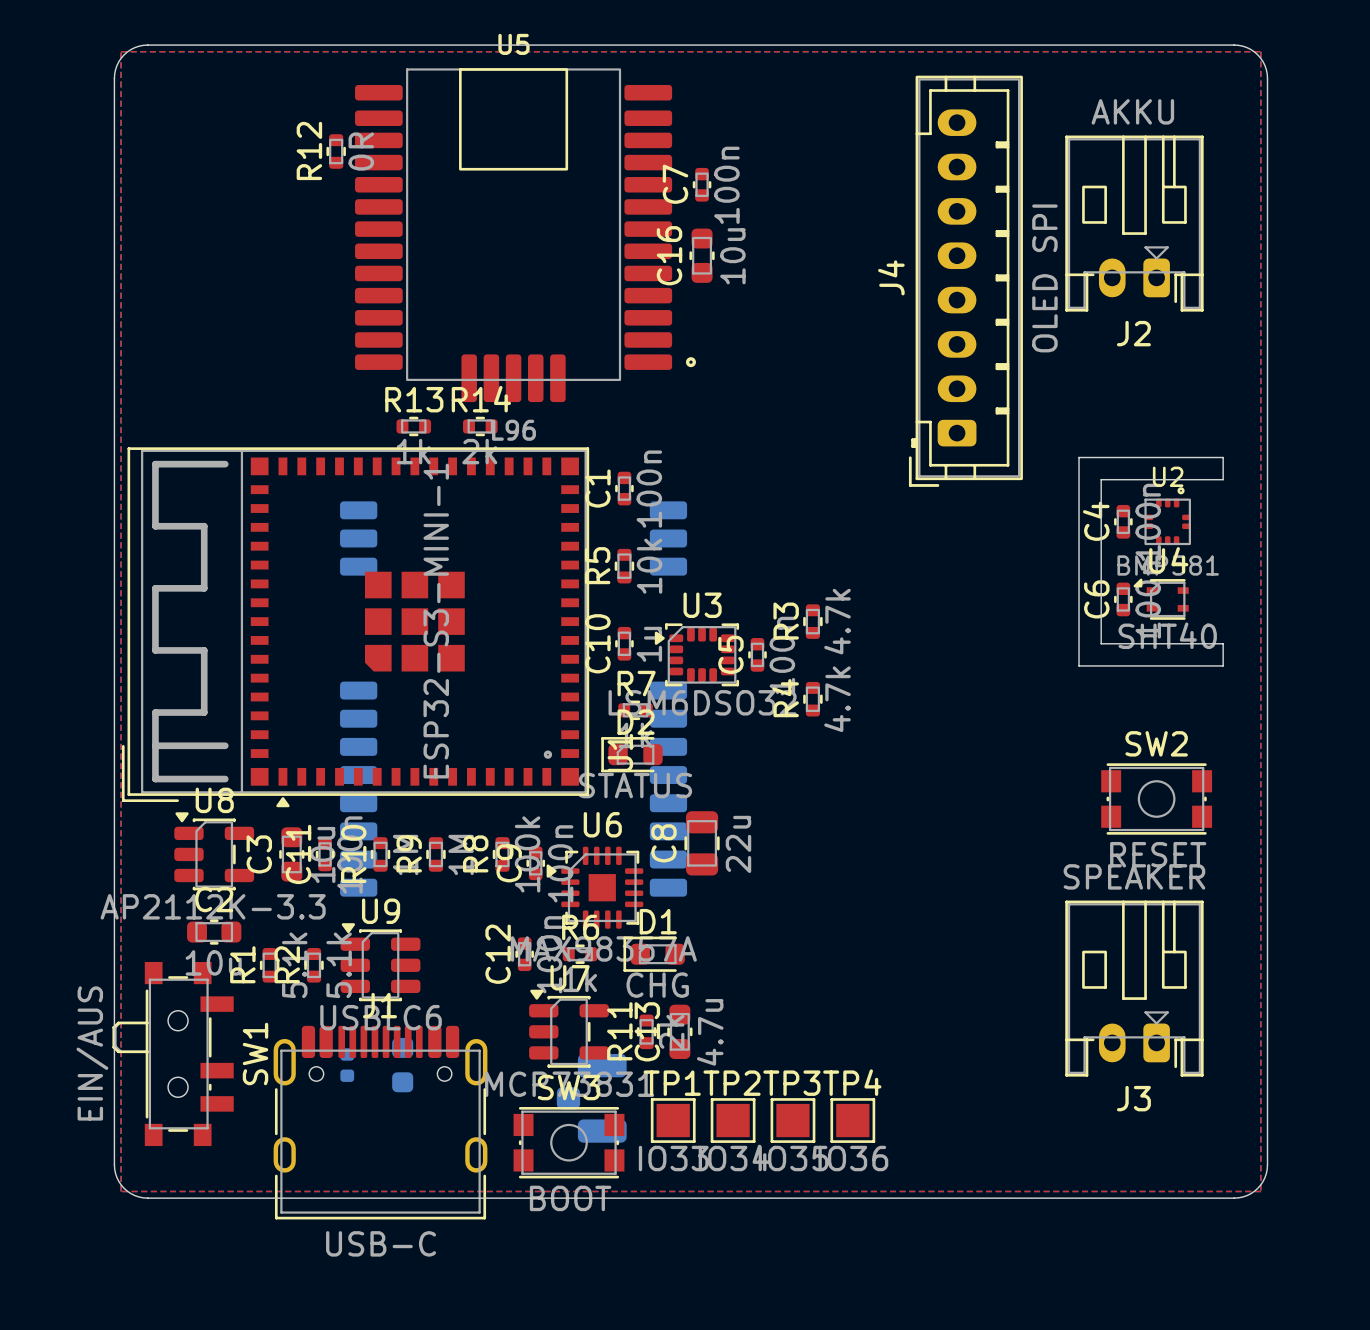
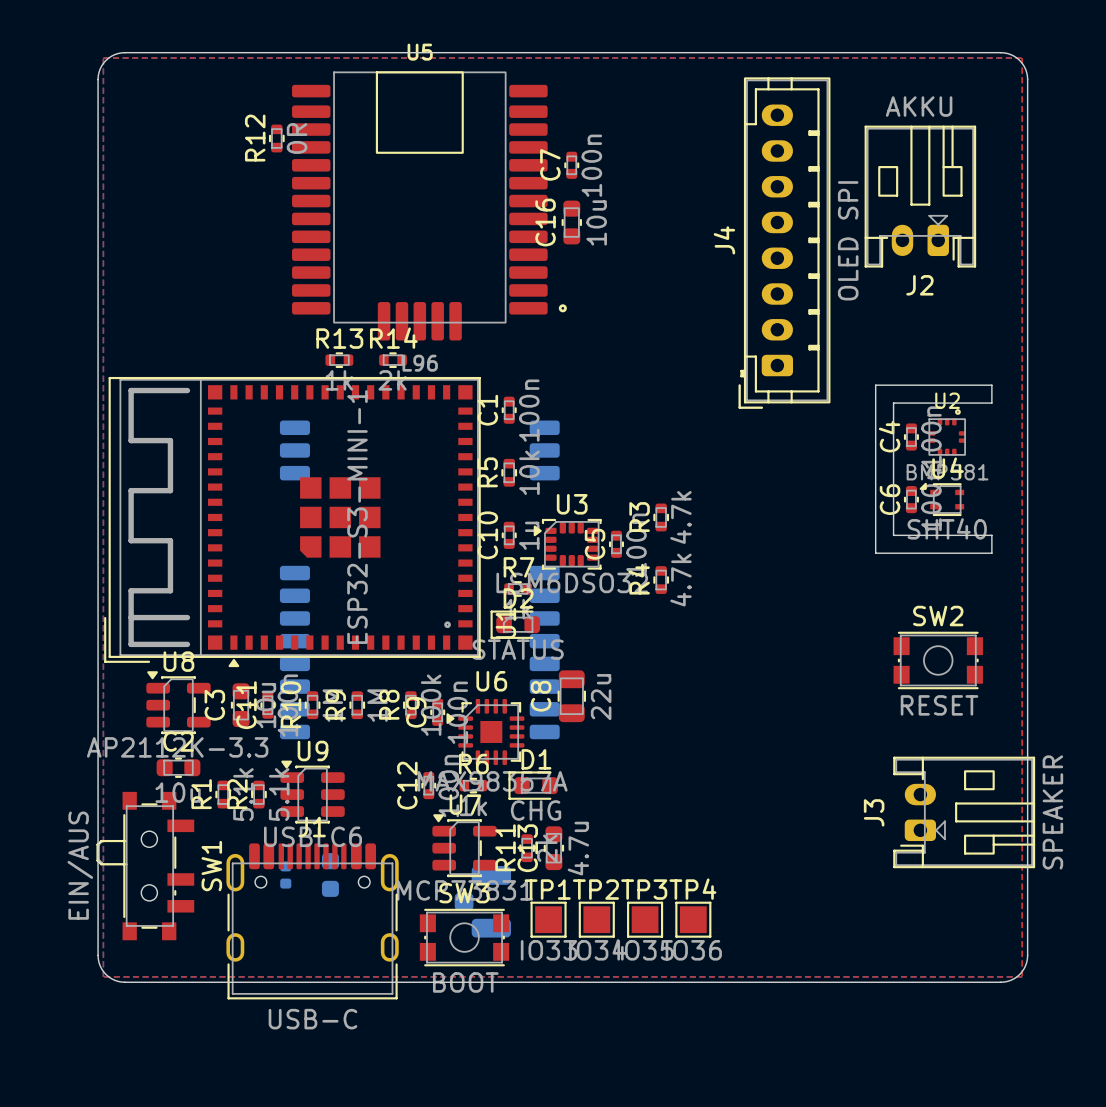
J3 rotation: 0° (1134, 988) -> 90° clockwise (964, 812)

